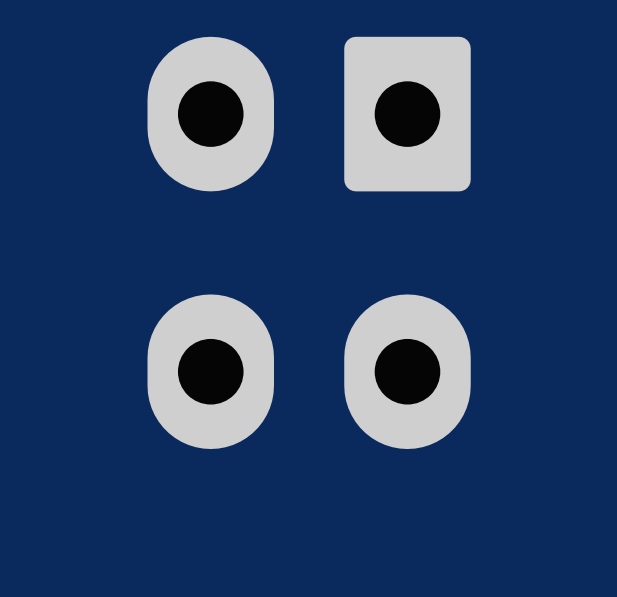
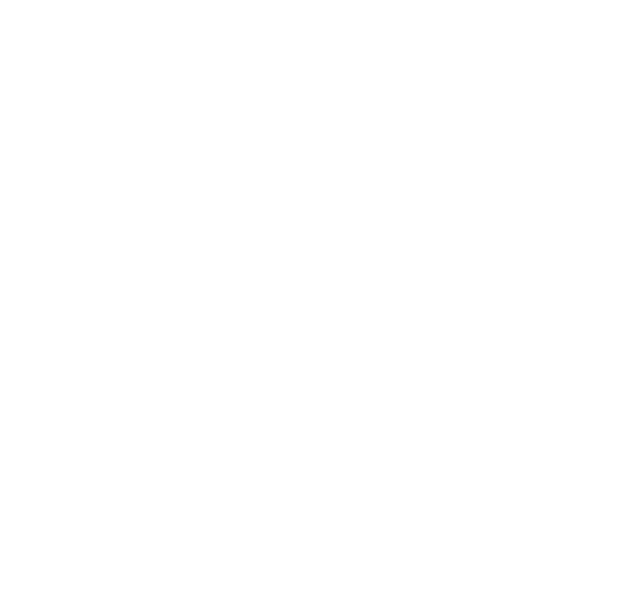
part: (309, 242) -> none

